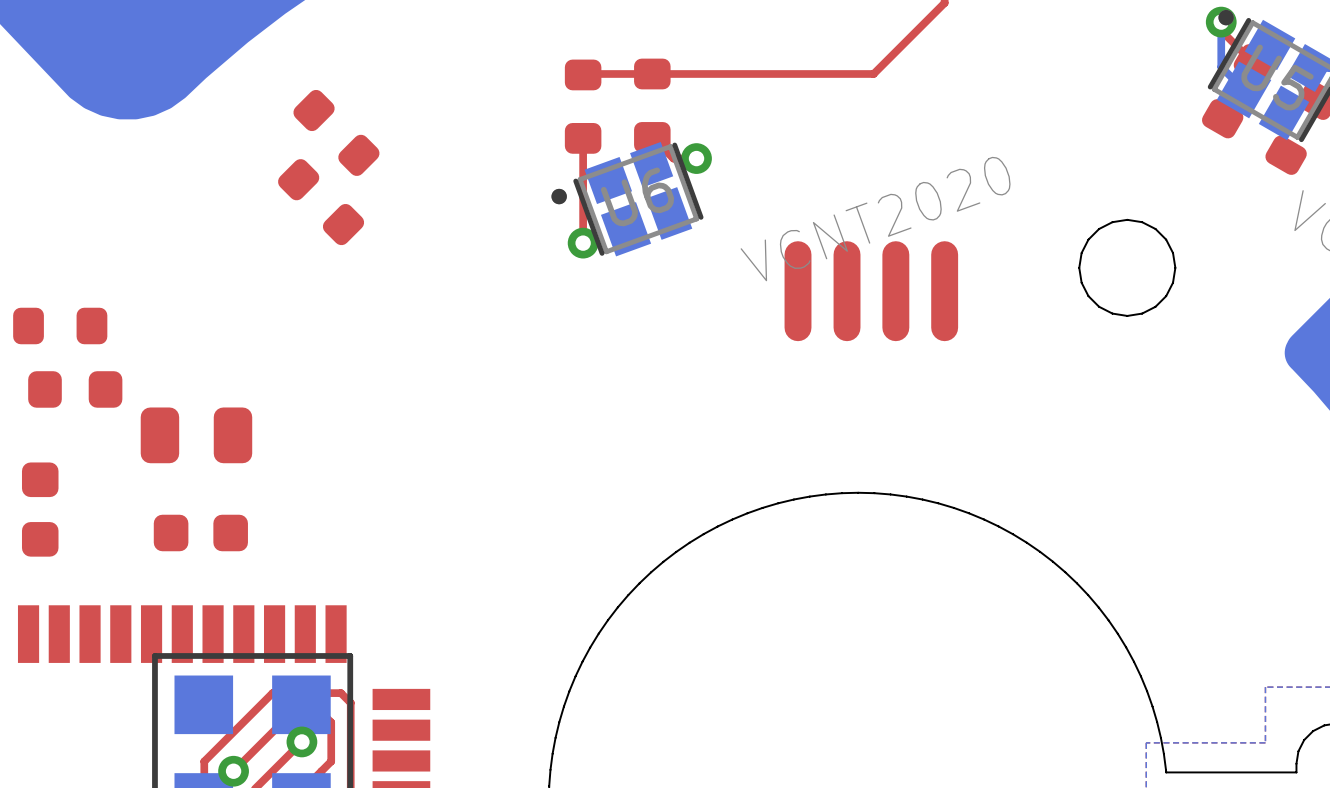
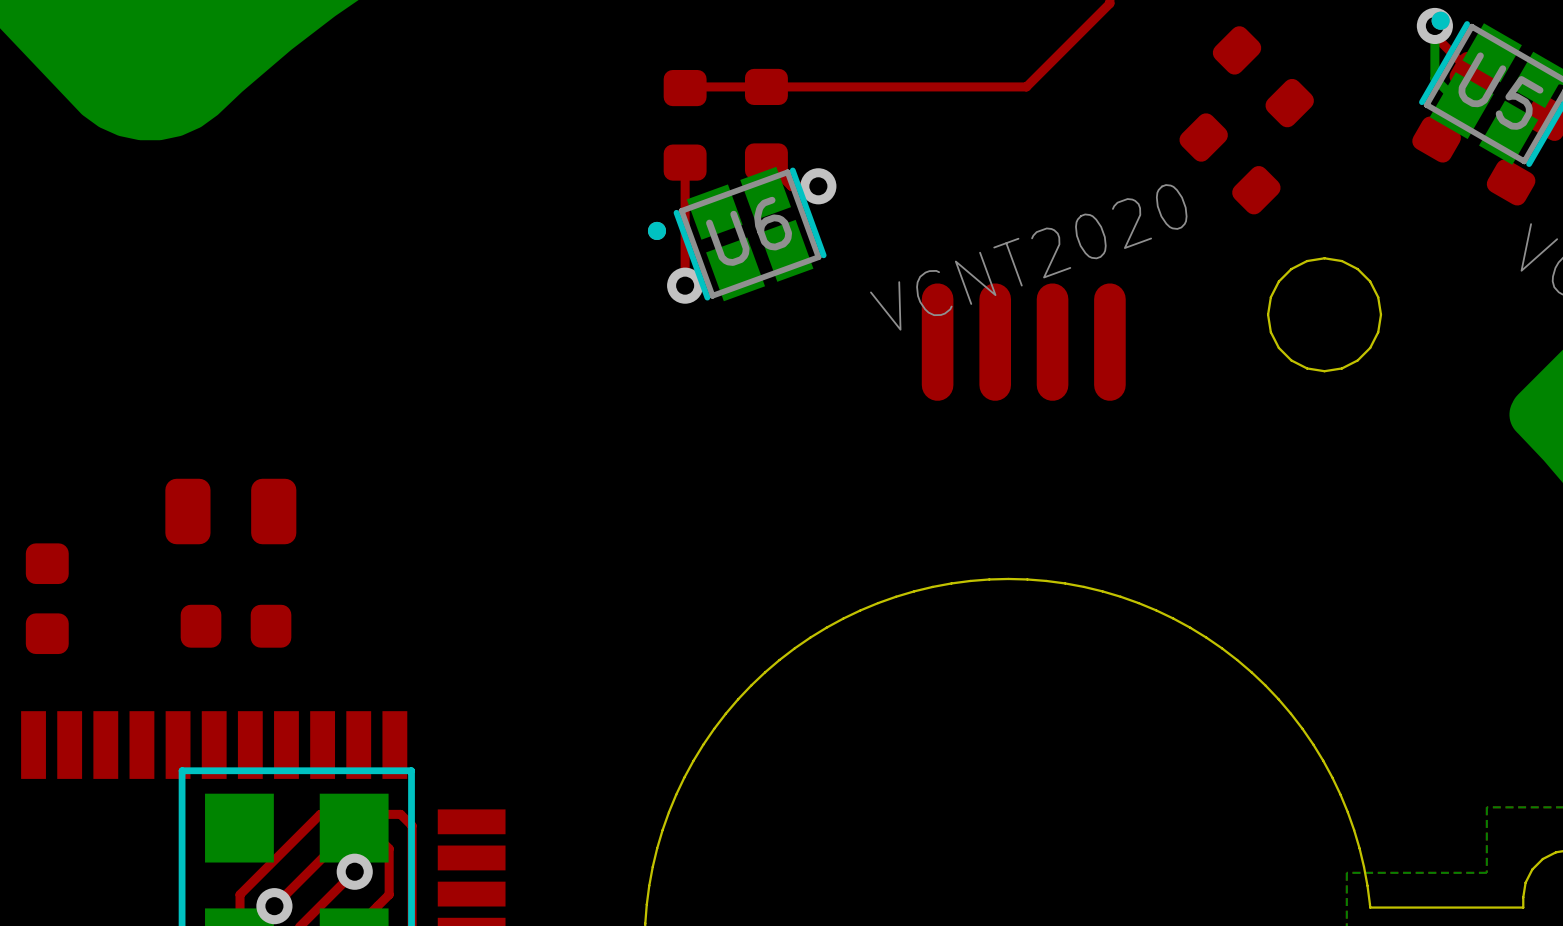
part: none -> (1263, 76)
part: (336, 132) -> none
part: none -> (1230, 163)
part: (321, 202) -> none
part: (60, 325) -> none
part: (75, 389) -> none

